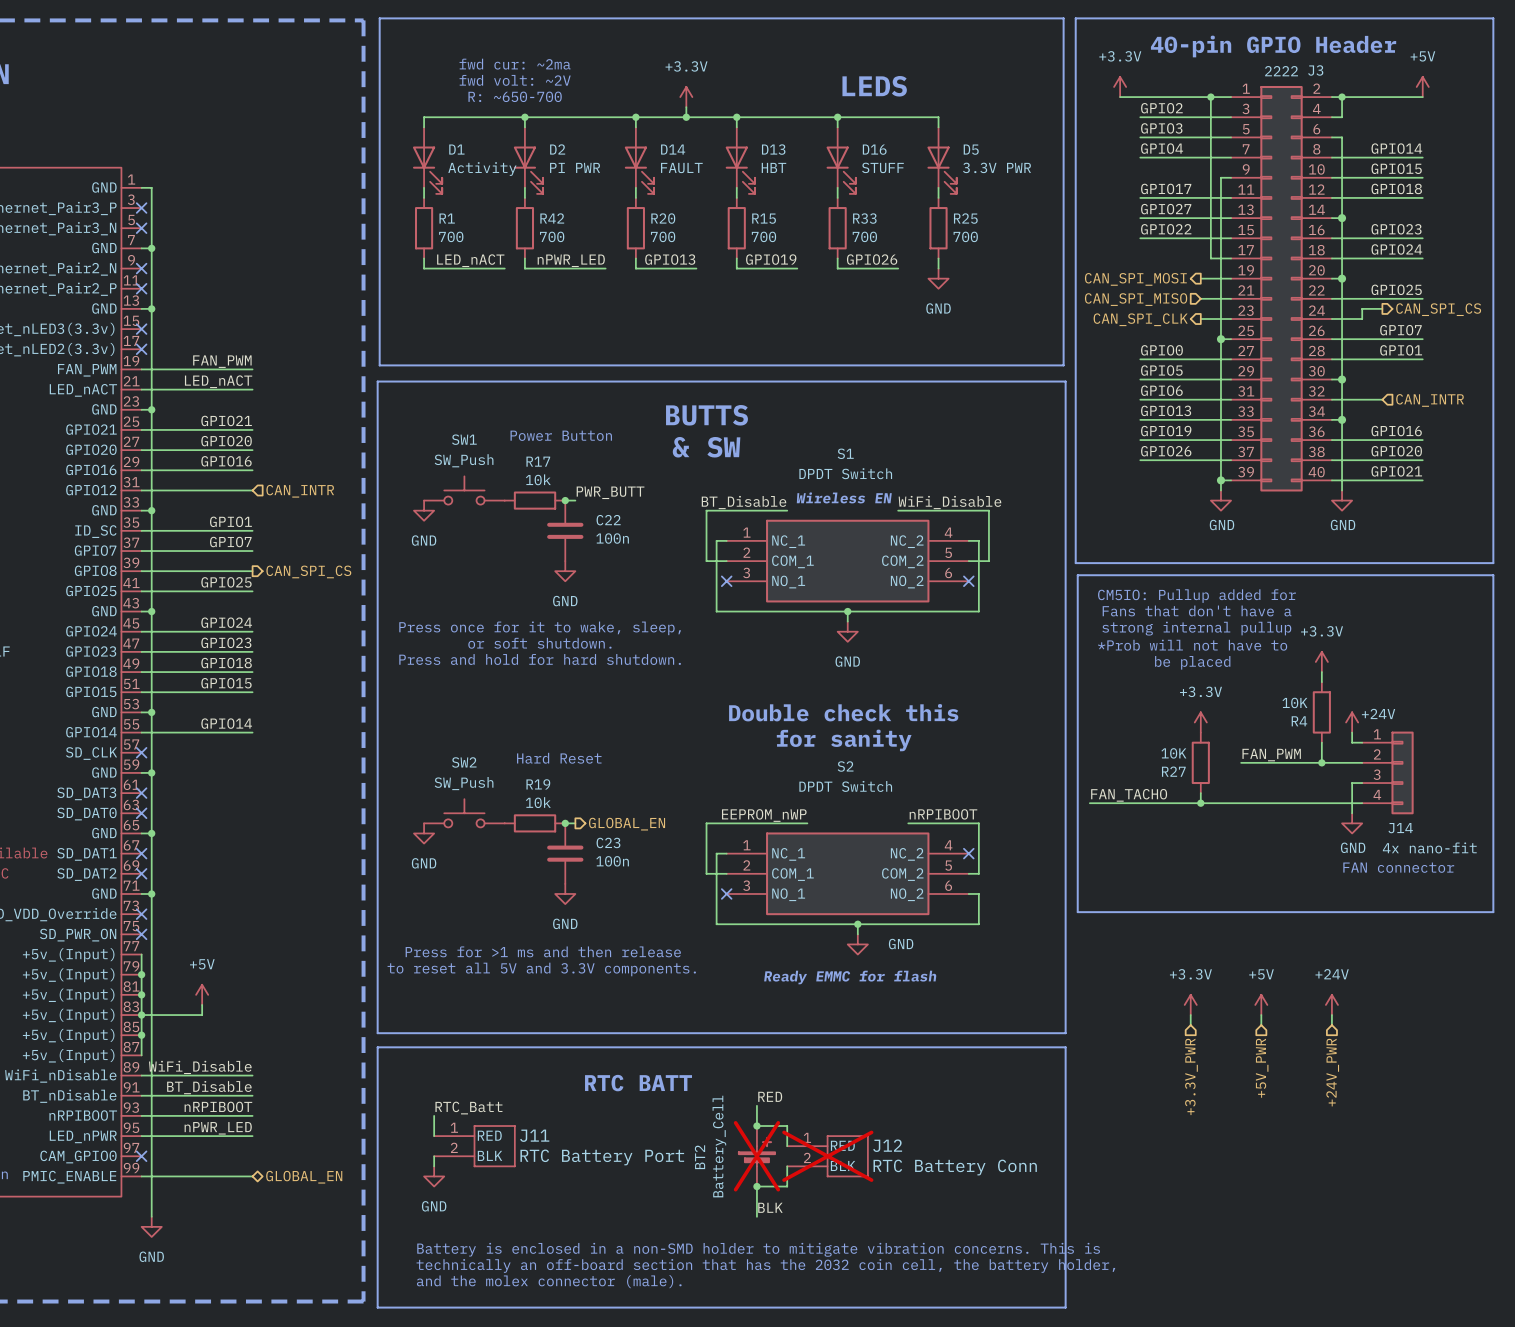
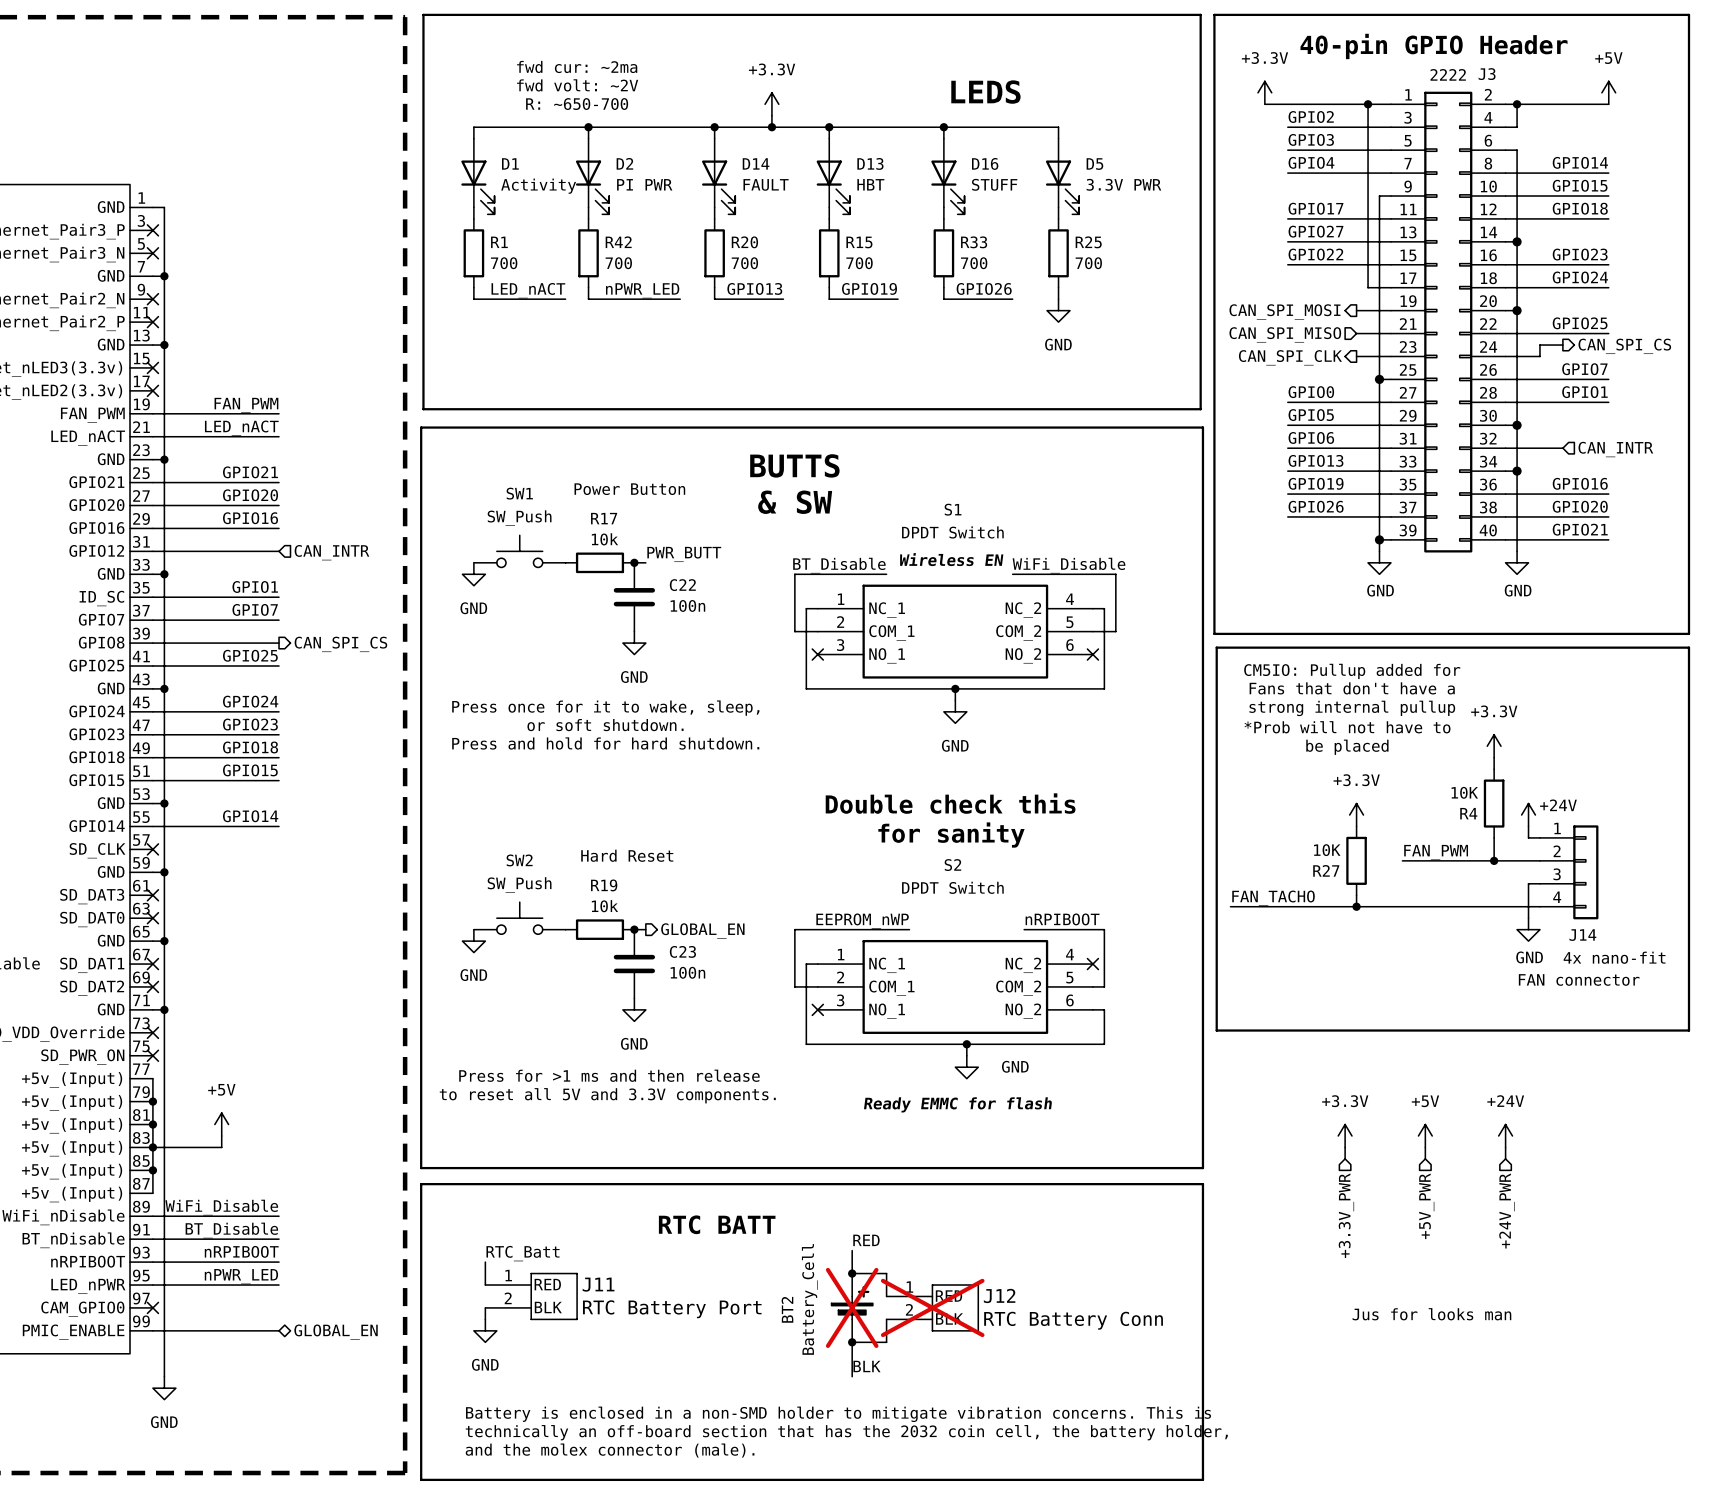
text: none -> Jus for looks man (1431, 1314)

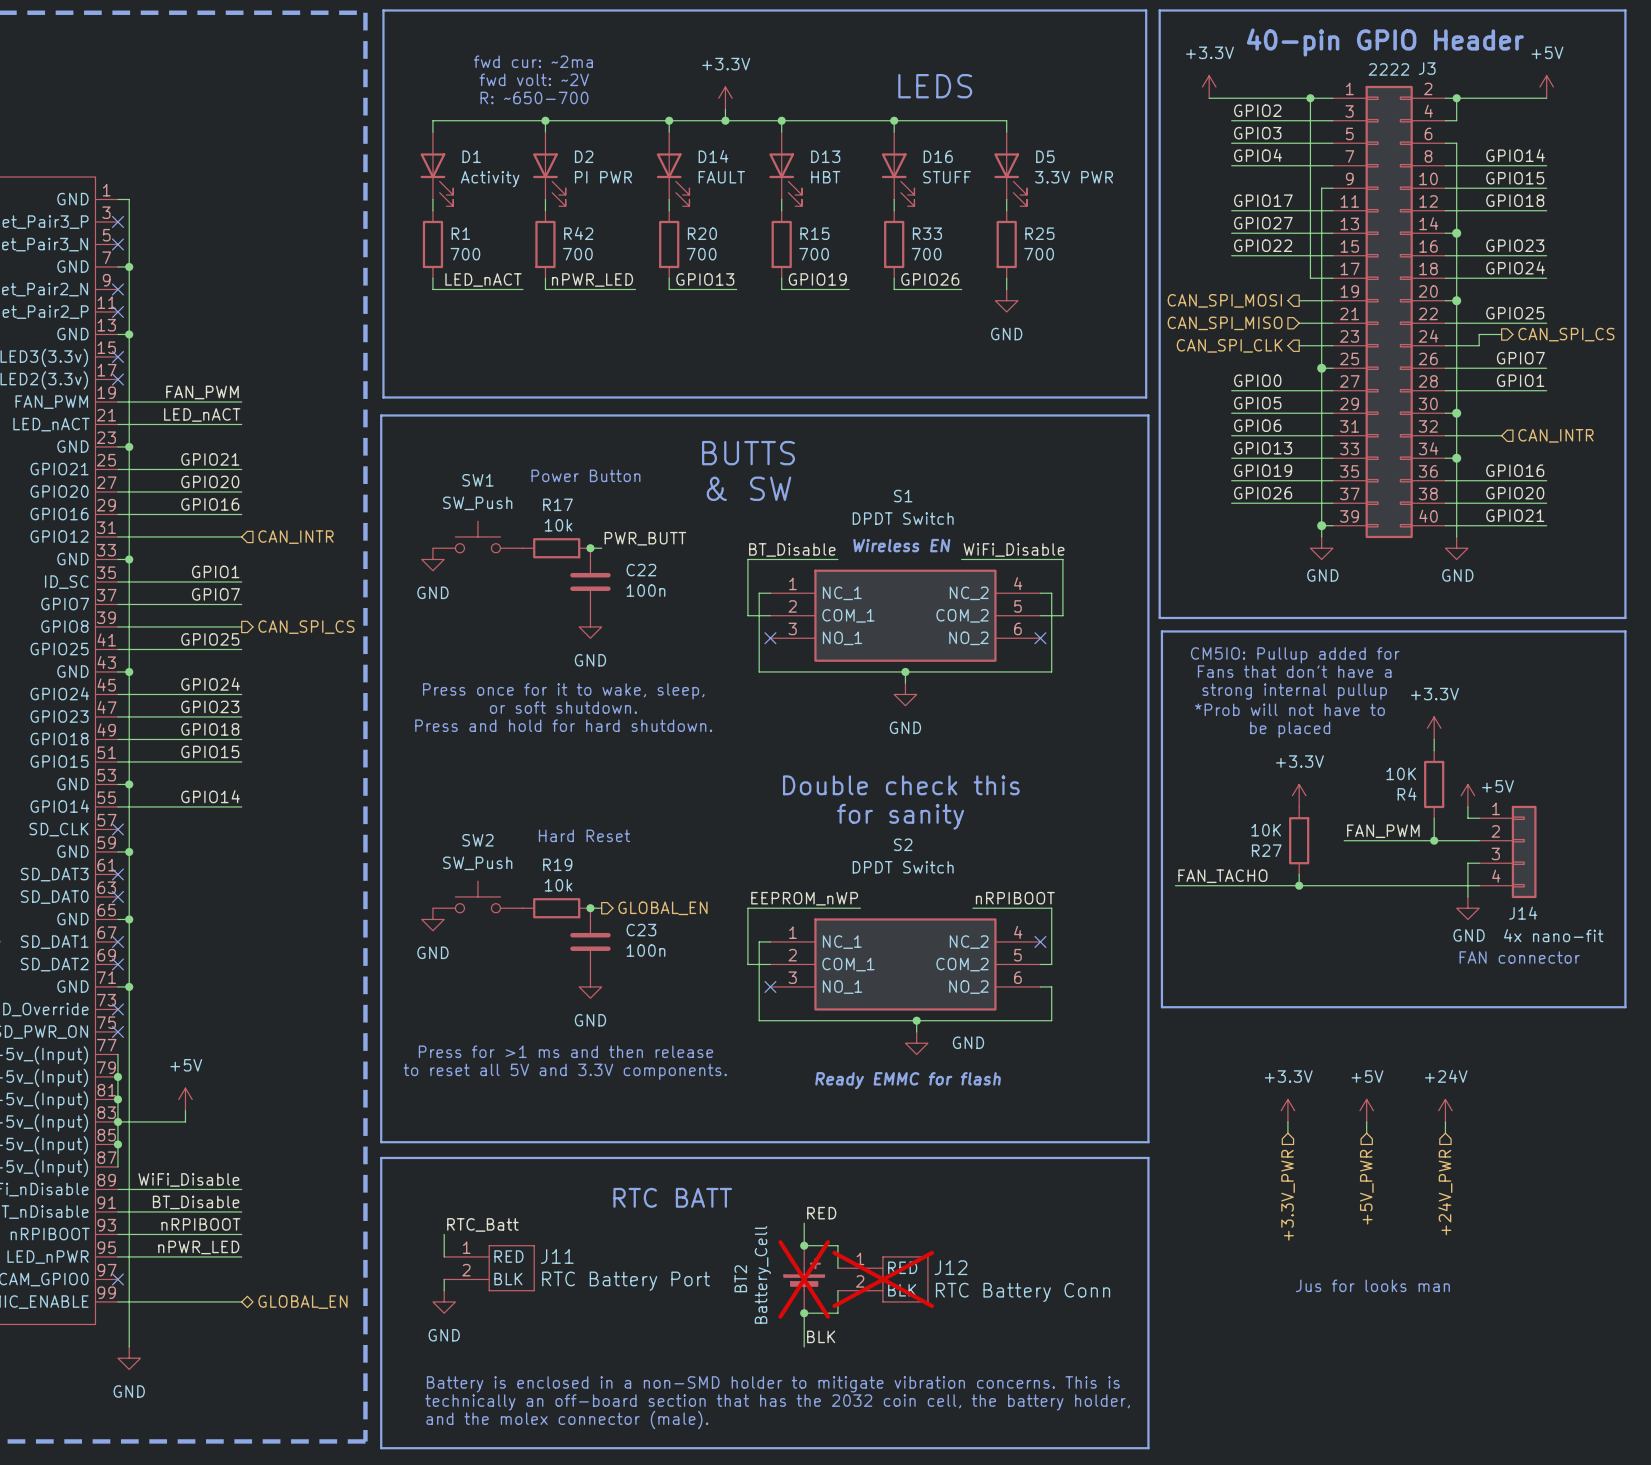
power symbol: +24V (1528, 815) -> +5V (1467, 795)

